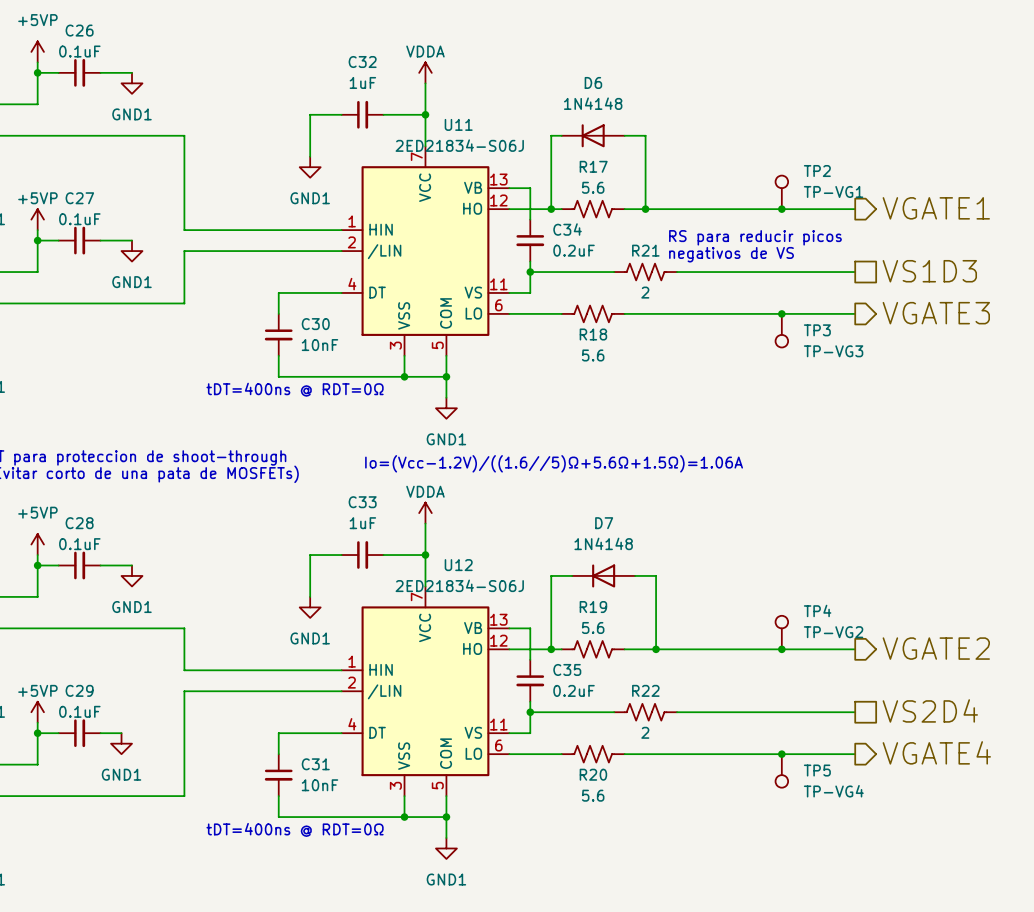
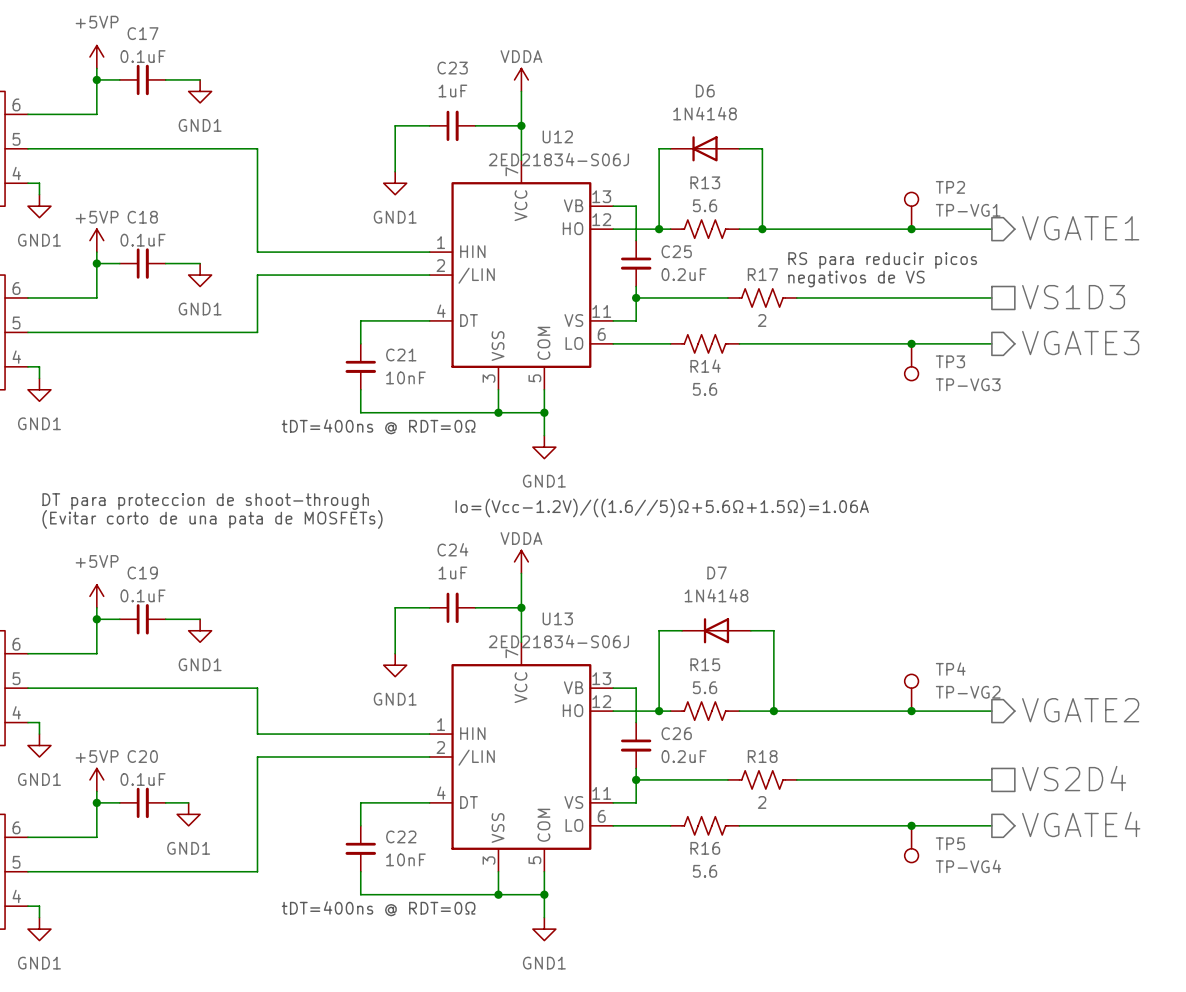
C26 name: C26 (79, 30) -> C17 (143, 33)
C32 name: C32 (362, 62) -> C23 (452, 68)
U11 name: U11 (458, 124) -> U12 (557, 136)
R17 name: R17 (593, 166) -> R13 (705, 182)
C27 name: C27 (79, 198) -> C18 (142, 217)
C34 name: C34 (567, 229) -> C25 (676, 251)
R21 name: R21 (645, 250) -> R17 (762, 274)
C30 name: C30 (315, 324) -> C21 (401, 354)
R18 name: R18 (593, 334) -> R14 (705, 366)
C33 name: C33 (362, 502) -> C24 (452, 549)
C28 name: C28 (79, 523) -> C19 (142, 572)
U12 name: U12 (458, 565) -> U13 (557, 618)
R19 name: R19 (593, 607) -> R15 (705, 664)
C35 name: C35 (567, 669) -> C26 (676, 733)
C29 name: C29 (79, 690) -> C20 (142, 756)
R22 name: R22 (645, 690) -> R18 (762, 756)
C31 name: C31 (315, 764) -> C22 (401, 836)
R20 name: R20 (593, 774) -> R16 (705, 848)

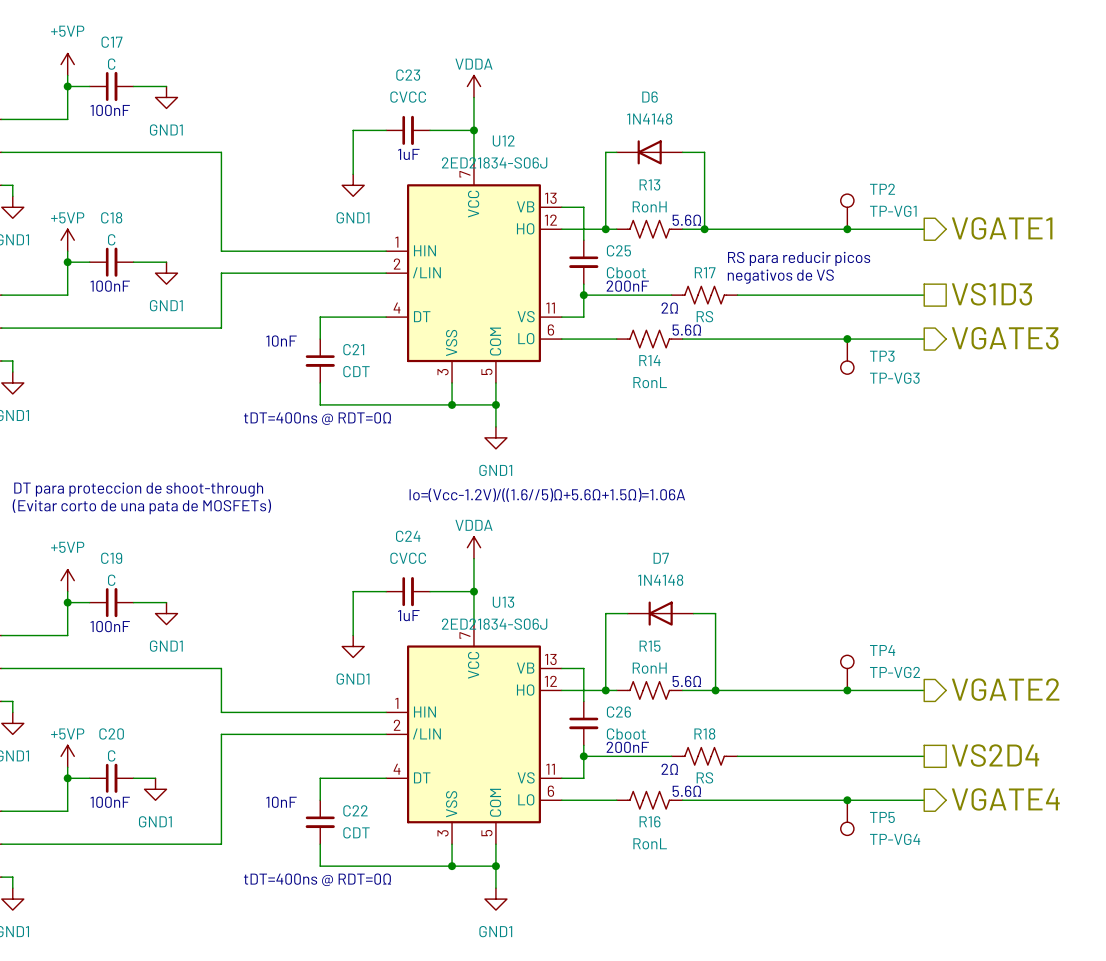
C17 value: 0.1uF (143, 56) -> C (111, 64)
C23 value: 1uF (452, 91) -> CVCC (408, 97)
text: none -> 100nF (110, 110)
text: none -> 1uF (408, 154)
R13 value: 5.6 (705, 205) -> RonH (649, 206)
text: none -> 5.6Ω (686, 220)
C18 value: 0.1uF (143, 240) -> C (111, 239)
C25 value: 0.2uF (684, 274) -> Cboot (626, 272)
text: none -> 100nF (110, 286)
text: none -> 200nF (627, 286)
text: none -> 2Ω (669, 308)
R17 value: 2 (762, 320) -> RS (704, 316)
text: none -> 5.6Ω (686, 330)
text: none -> 10nF (281, 341)
C21 value: 10nF (405, 377) -> CDT (356, 371)
R14 value: 5.6 (705, 389) -> RonL (650, 382)
C24 value: 1uF (452, 572) -> CVCC (408, 558)
C19 value: 0.1uF (143, 595) -> C (111, 580)
text: none -> 1uF (408, 615)
text: none -> 100nF (110, 626)
R15 value: 5.6 (705, 687) -> RonH (649, 668)
text: none -> 5.6Ω (686, 681)
C26 value: 0.2uF (684, 756) -> Cboot (626, 734)
text: none -> 200nF (627, 747)
C20 value: 0.1uF (143, 779) -> C (111, 755)
text: none -> 2Ω (669, 769)
R18 value: 2 (762, 802) -> RS (704, 777)
text: none -> 5.6Ω (686, 791)
text: none -> 100nF (110, 802)
text: none -> 10nF (281, 802)
C22 value: 10nF (405, 859) -> CDT (356, 832)
R16 value: 5.6 (705, 871) -> RonL (650, 843)

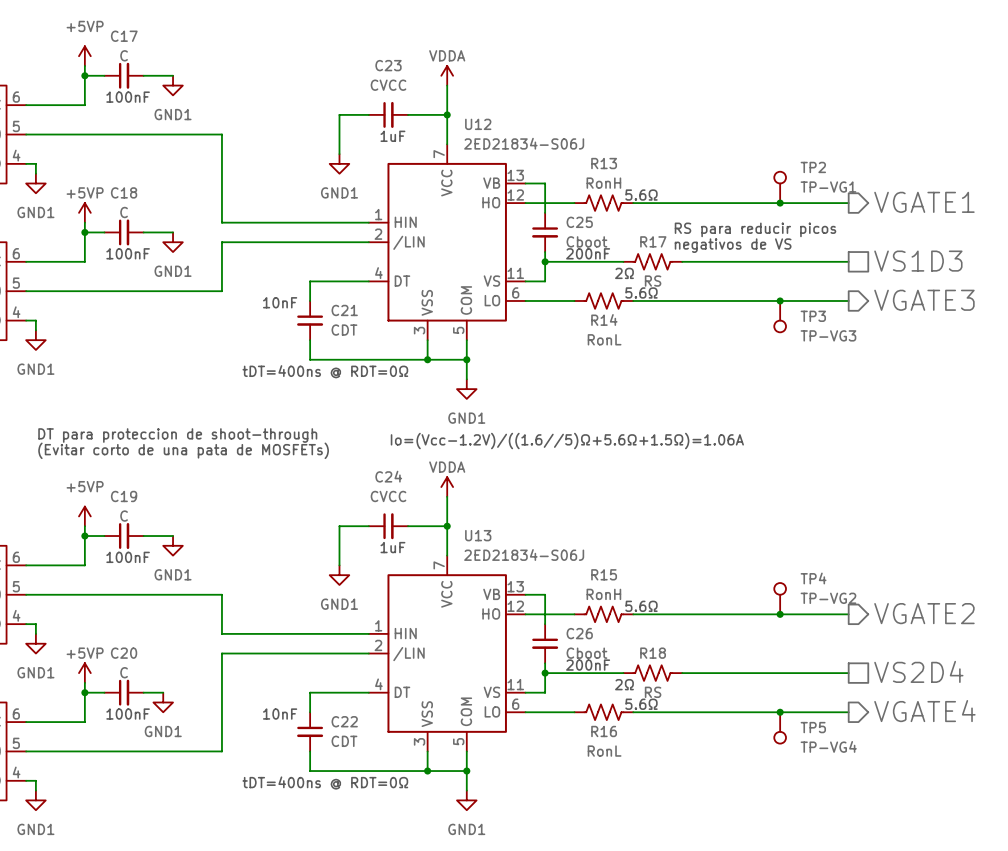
wire: (616, 152) (605, 152) (605, 229) -> none
D6: 1N4148 (649, 152) -> none
wire: (682, 152) (704, 152) (704, 229) -> none
U12 value position: 2ED21834-S06J (494, 162) -> 2ED21834-S06J (524, 143)
junction: (605, 229) -> none
junction: (704, 229) -> none
wire: (627, 613) (605, 613) (605, 690) -> none
D7: 1N4148 (660, 613) -> none
wire: (693, 613) (715, 613) (715, 690) -> none
U13 value position: 2ED21834-S06J (494, 624) -> 2ED21834-S06J (524, 554)
junction: (605, 690) -> none
junction: (715, 690) -> none

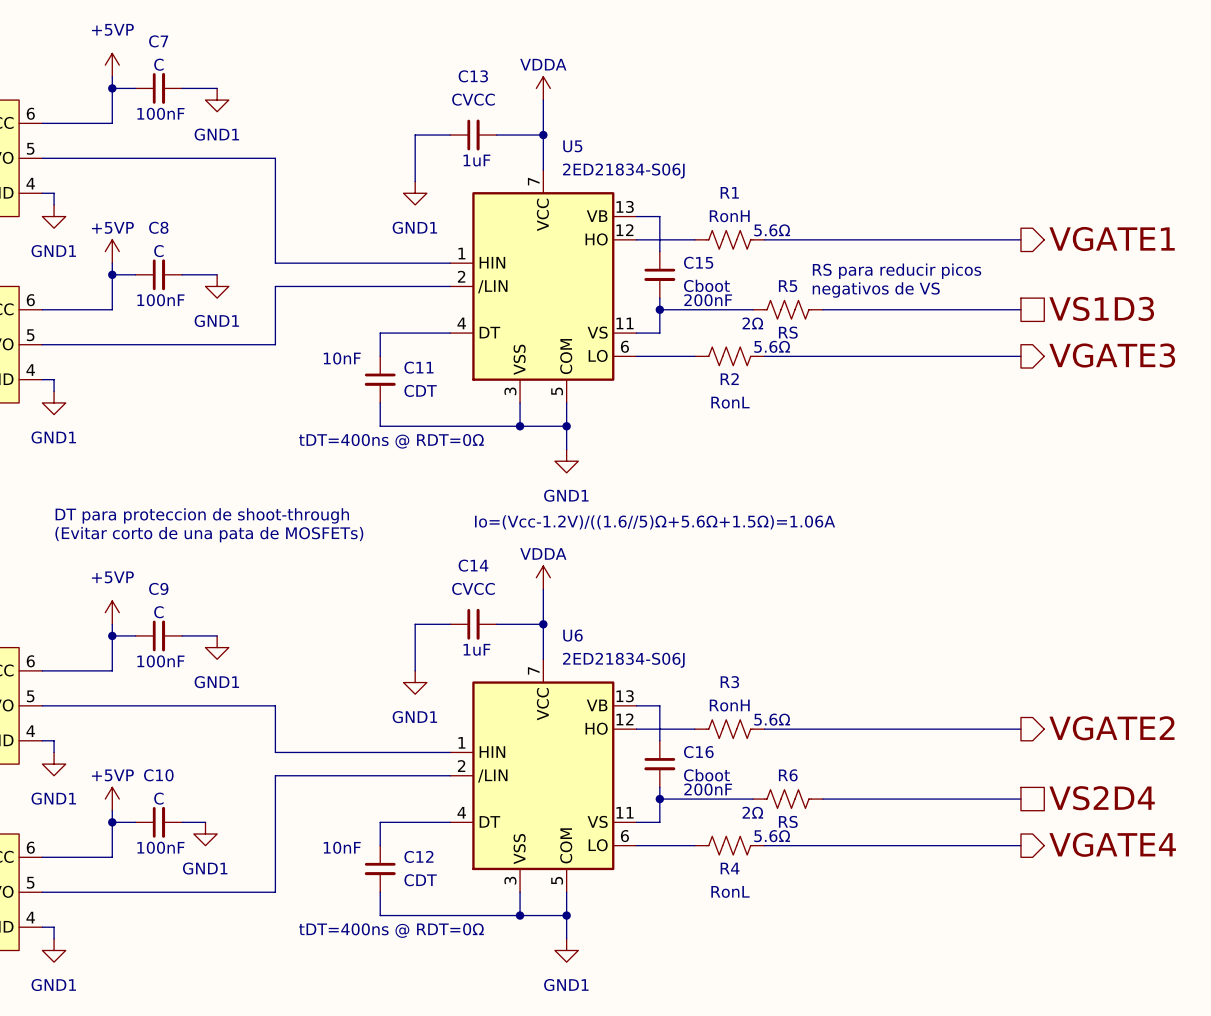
C17 name: C17 (124, 36) -> C7 (158, 41)
C23 name: C23 (388, 65) -> C13 (473, 76)
U12 name: U12 (478, 124) -> U5 (572, 146)
R13 name: R13 (604, 163) -> R1 (729, 192)
TP2: TP-VG1 (780, 187) -> none
C18 name: C18 (124, 192) -> C8 (158, 227)
junction: (780, 203) -> none
C25 name: C25 (579, 222) -> C15 (698, 262)
R17 name: R17 (653, 241) -> R5 (788, 286)
junction: (780, 300) -> none
C21 name: C21 (344, 310) -> C11 (418, 367)
TP3: TP-VG3 (780, 316) -> none
R14 name: R14 (604, 319) -> R2 (729, 379)
C24 name: C24 (388, 476) -> C14 (473, 565)
C19 name: C19 (124, 496) -> C9 (158, 588)
U13 name: U13 (478, 535) -> U6 (572, 635)
R15 name: R15 (604, 574) -> R3 (729, 682)
TP4: TP-VG2 (780, 598) -> none
junction: (780, 614) -> none
C26 name: C26 (579, 633) -> C16 (698, 752)
C20 name: C20 (124, 653) -> C10 (158, 775)
R18 name: R18 (653, 653) -> R6 (788, 775)
junction: (780, 712) -> none
C22 name: C22 (344, 721) -> C12 (418, 856)
TP5: TP-VG4 (780, 727) -> none
R16 name: R16 (604, 731) -> R4 (730, 868)

